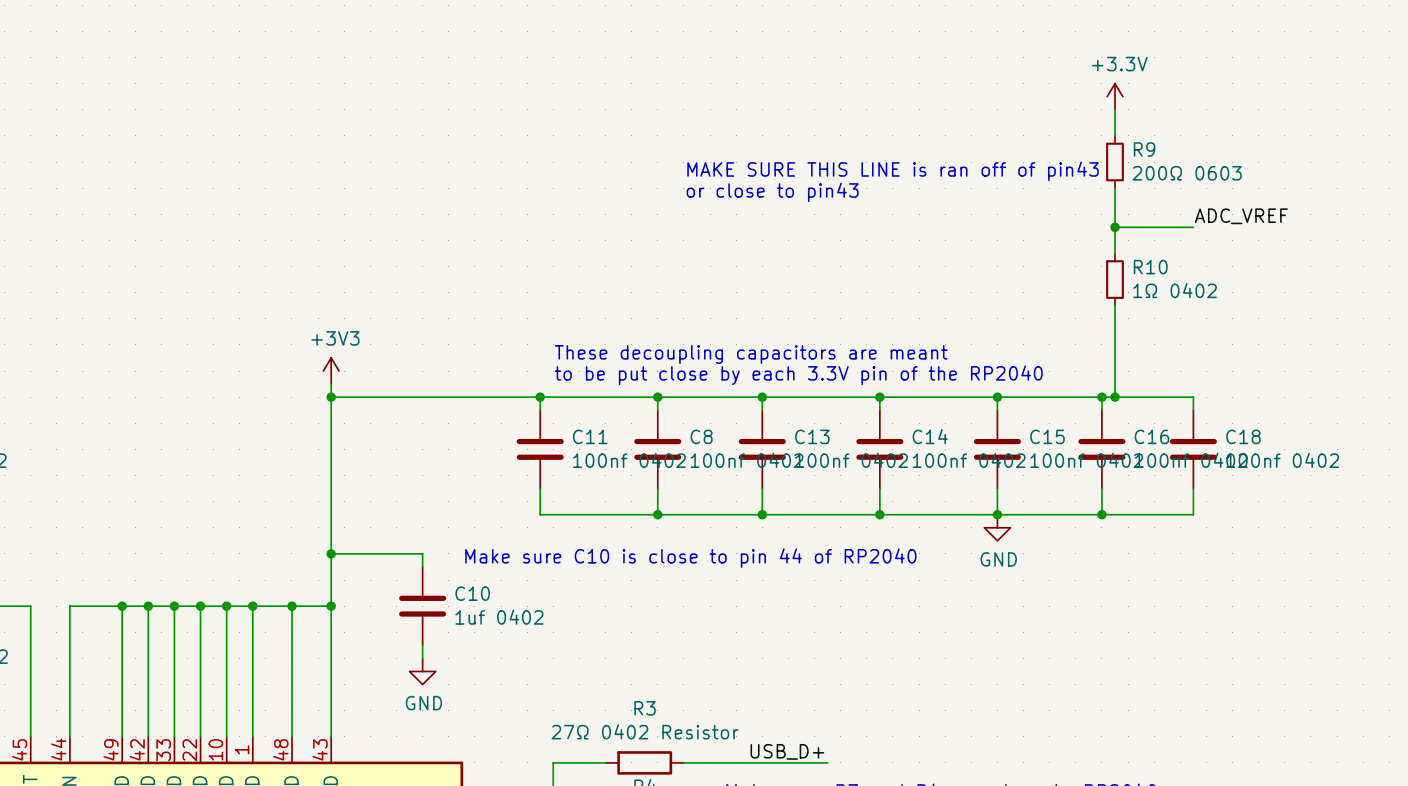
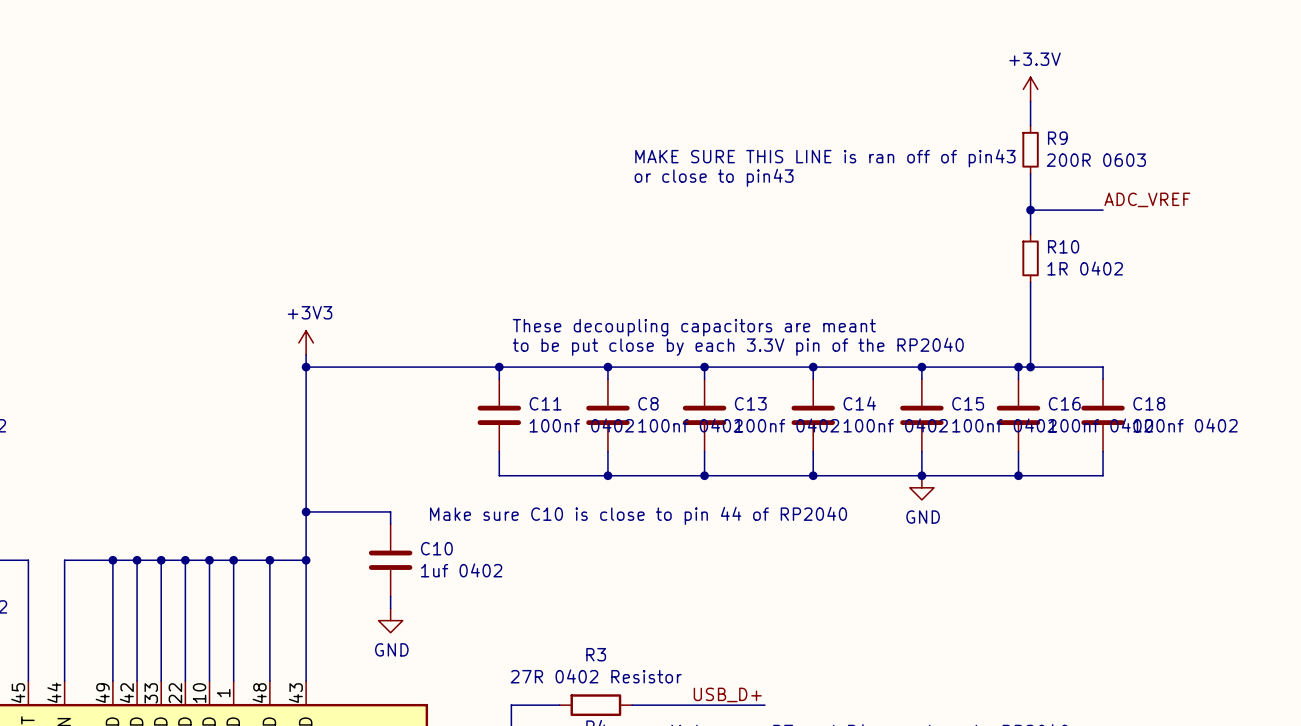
R9 value: 200Ω 0603 (1187, 173) -> 200R 0603 (1096, 160)
R10 value: 1Ω 0402 (1174, 290) -> 1R 0402 (1085, 268)
R3 value: 27Ω 0402 Resistor (645, 731) -> 27R 0402 Resistor (596, 676)

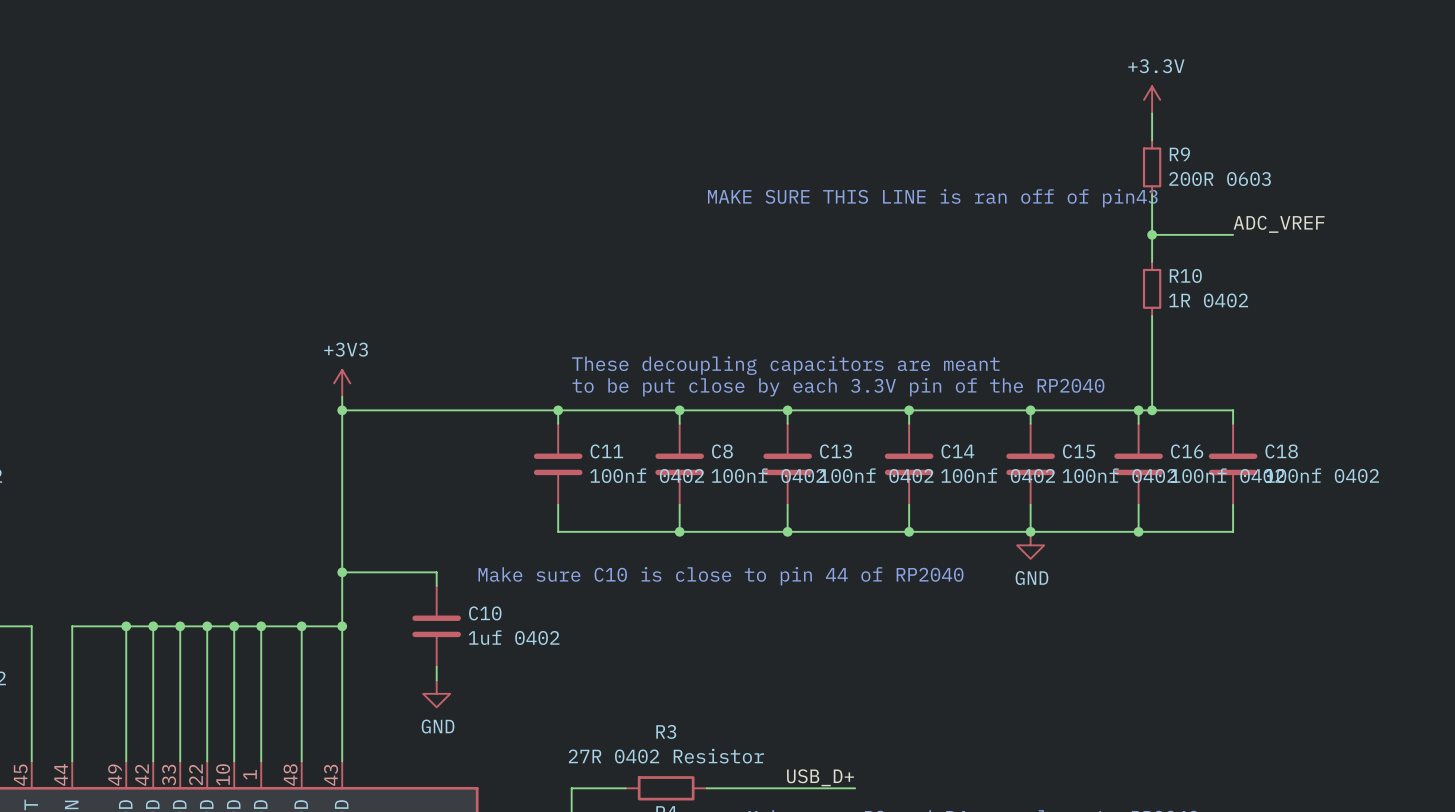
text: MAKE SURE THIS LINE is ran off of pin43 (825, 158) -> none
text: or close to pin43 (714, 177) -> MAKE SURE THIS LINE is ran off of pin43 (932, 198)

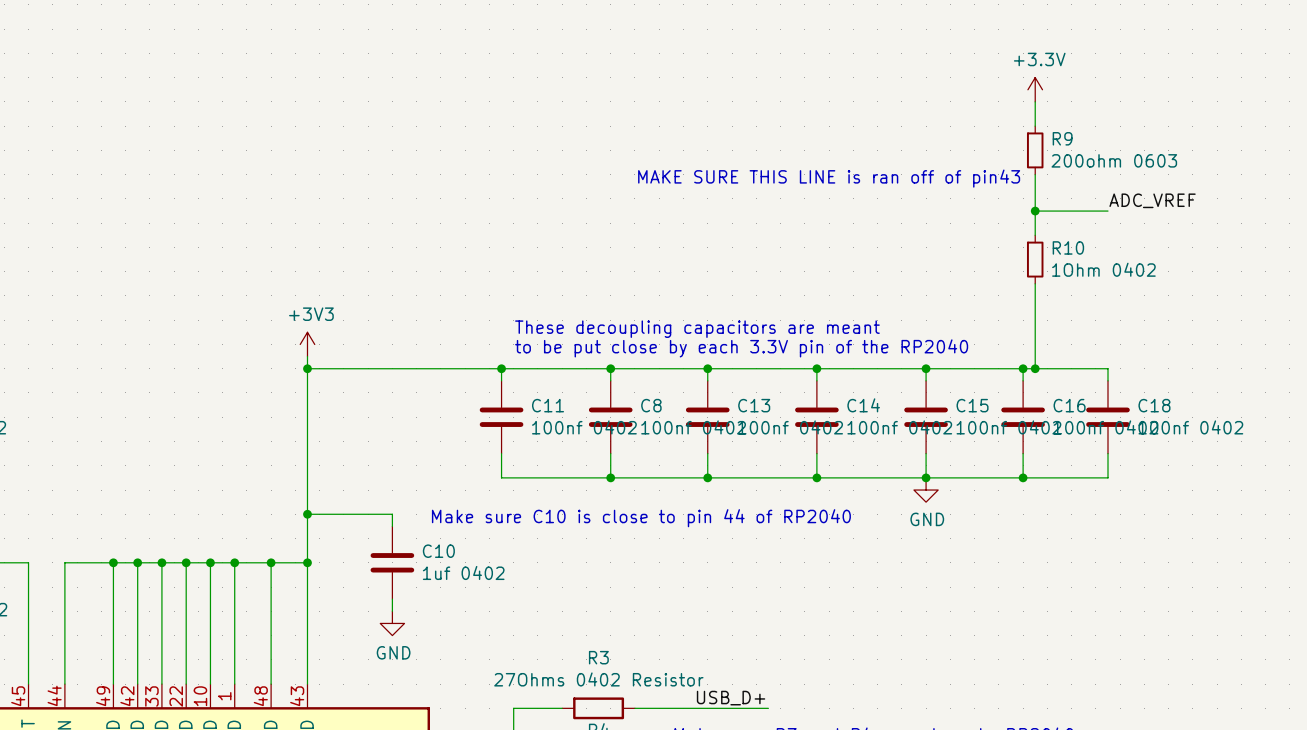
R9 value: 200R 0603 (1220, 179) -> 200ohm 0603 (1114, 160)
R10 value: 1R 0402 (1208, 300) -> 1Ohm 0402 (1103, 269)
R3 value: 27R 0402 Resistor (666, 756) -> 27Ohms 0402 Resistor (598, 679)

